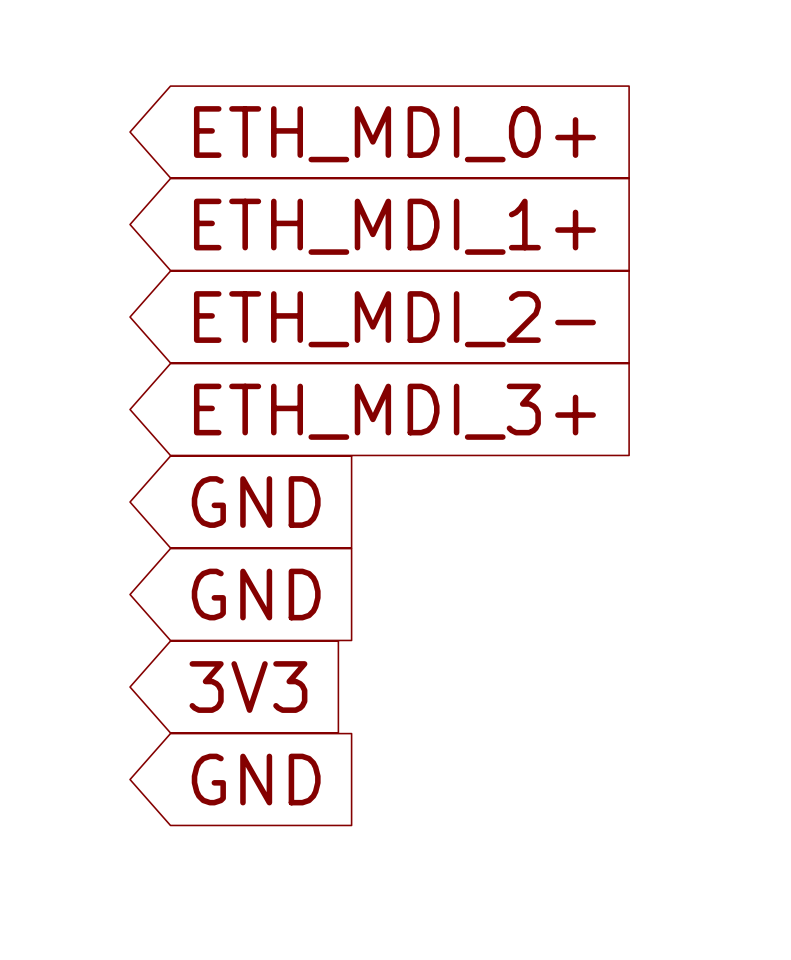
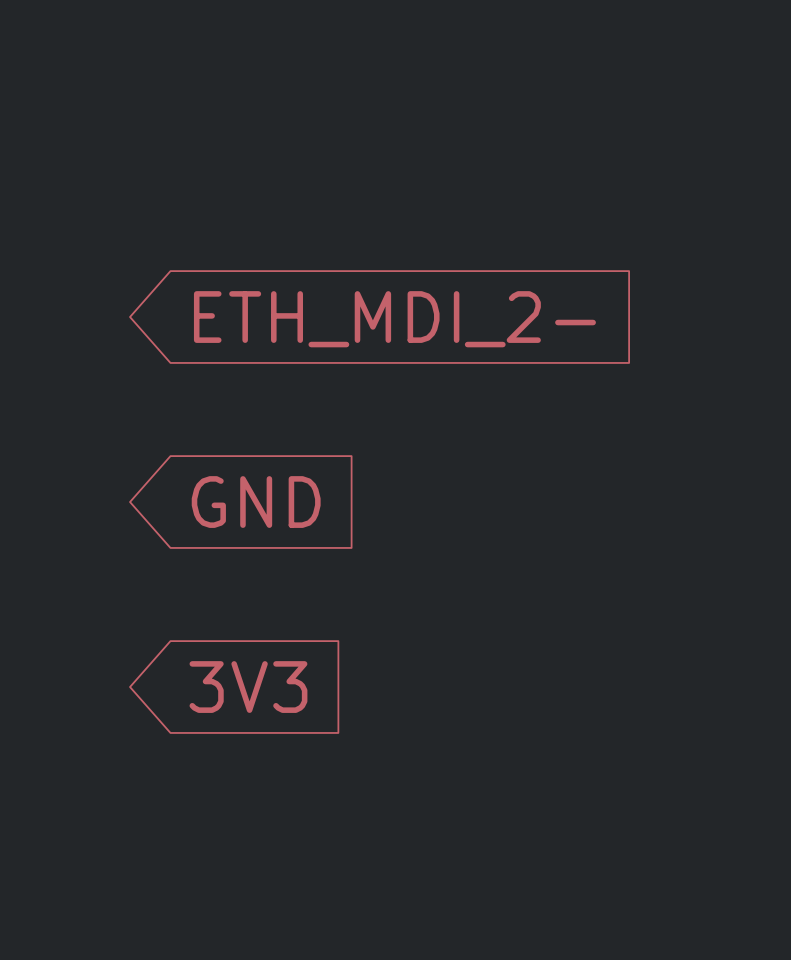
global label: ETH_MDI_0+ (394, 134) -> none
global label: ETH_MDI_1+ (394, 226) -> none
global label: ETH_MDI_3+ (394, 411) -> none
global label: GND (256, 594) -> none
global label: GND (256, 779) -> none

